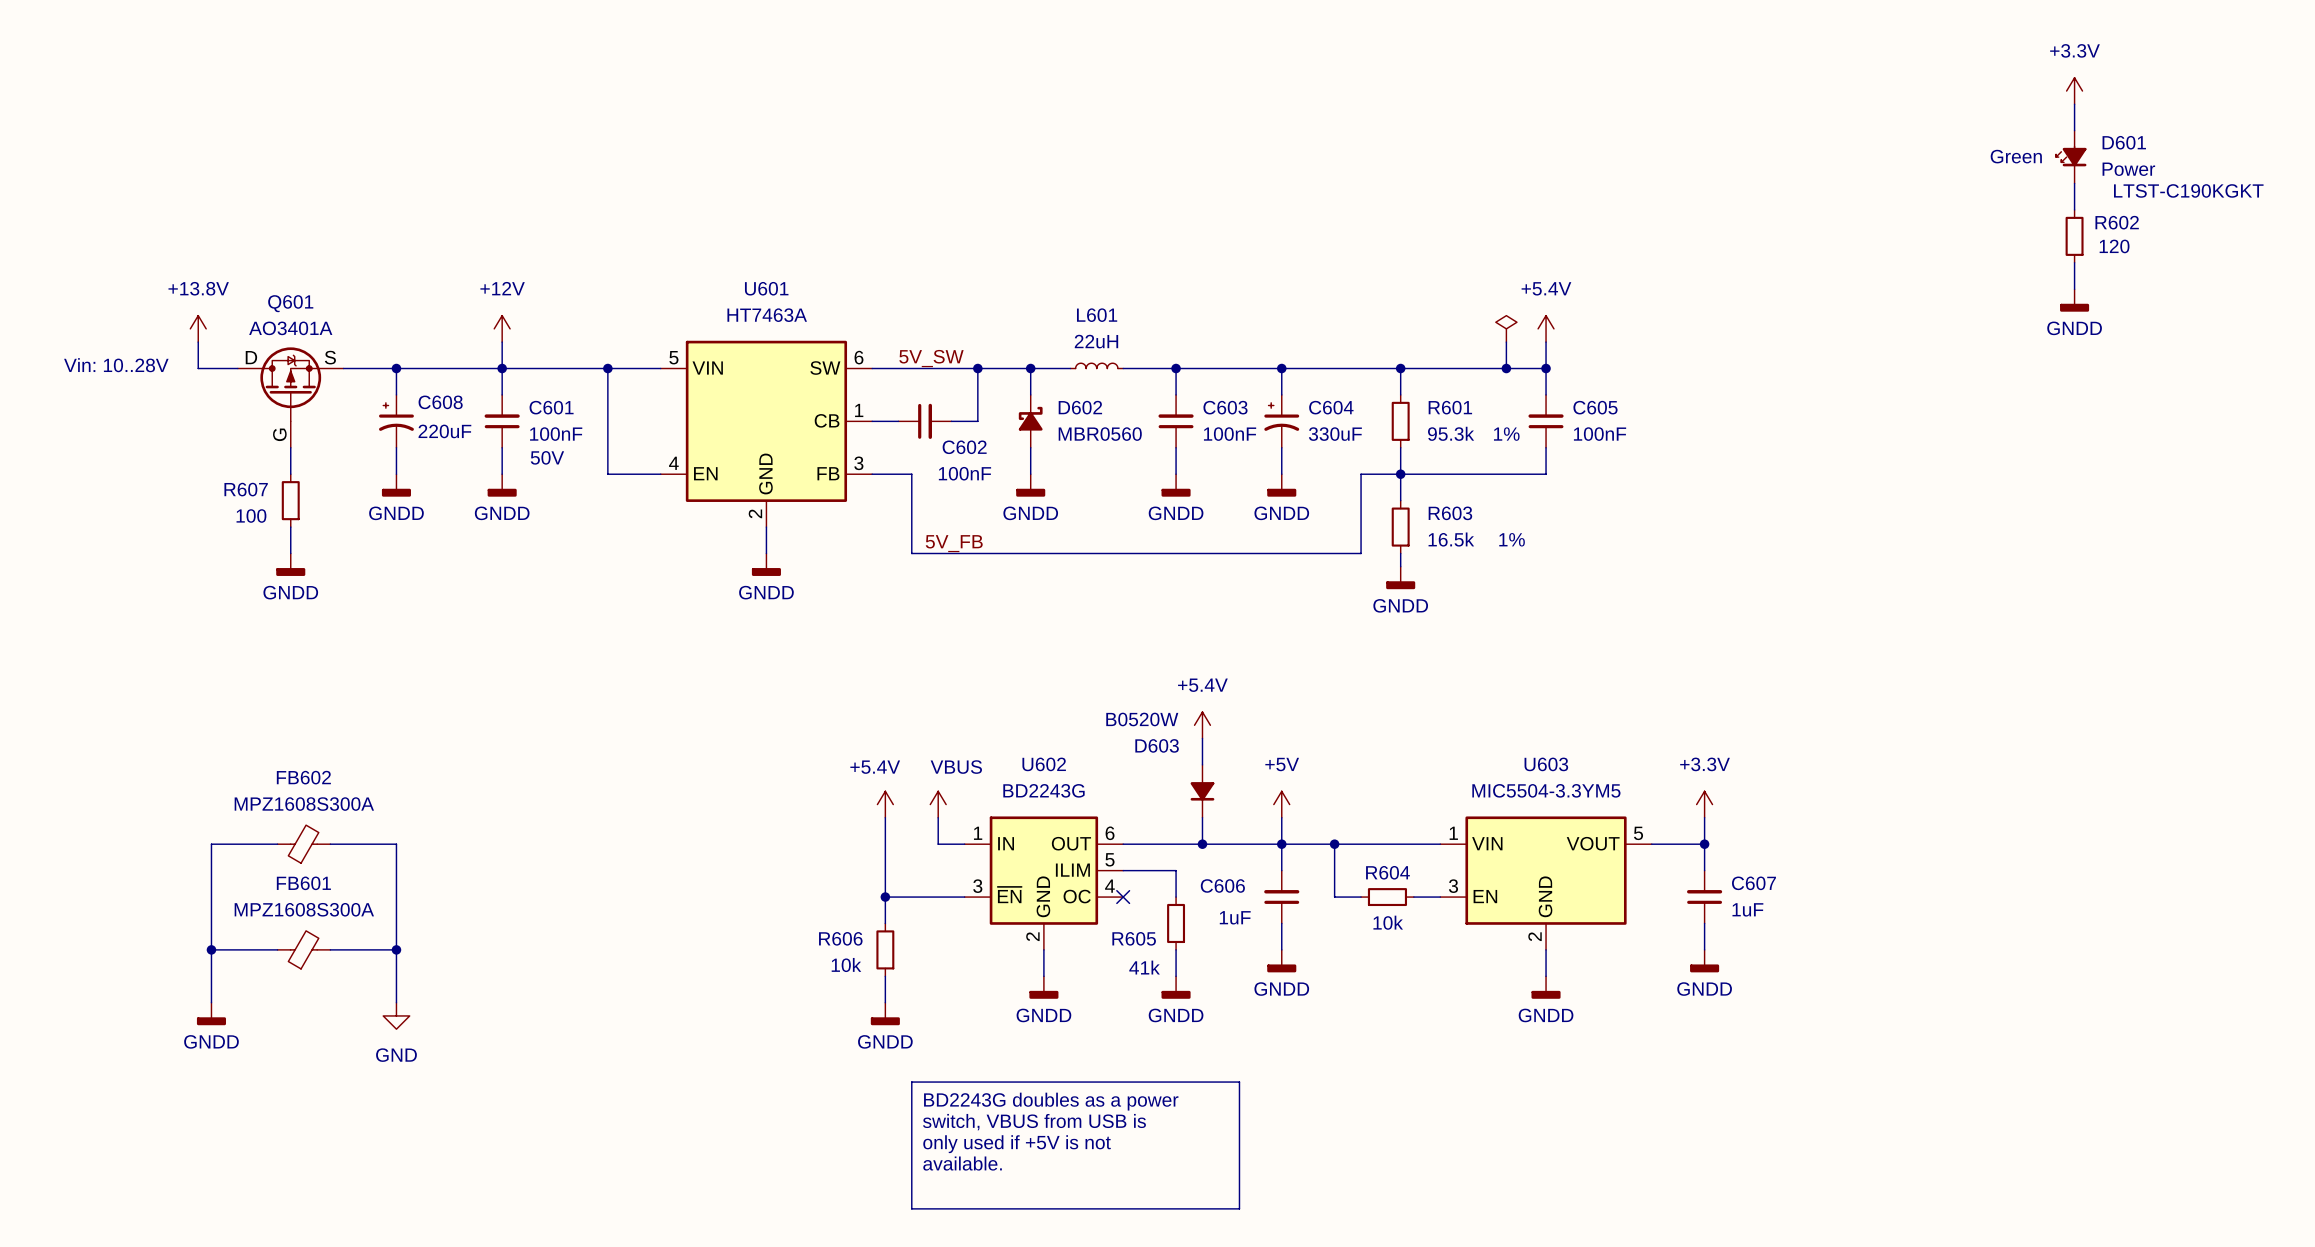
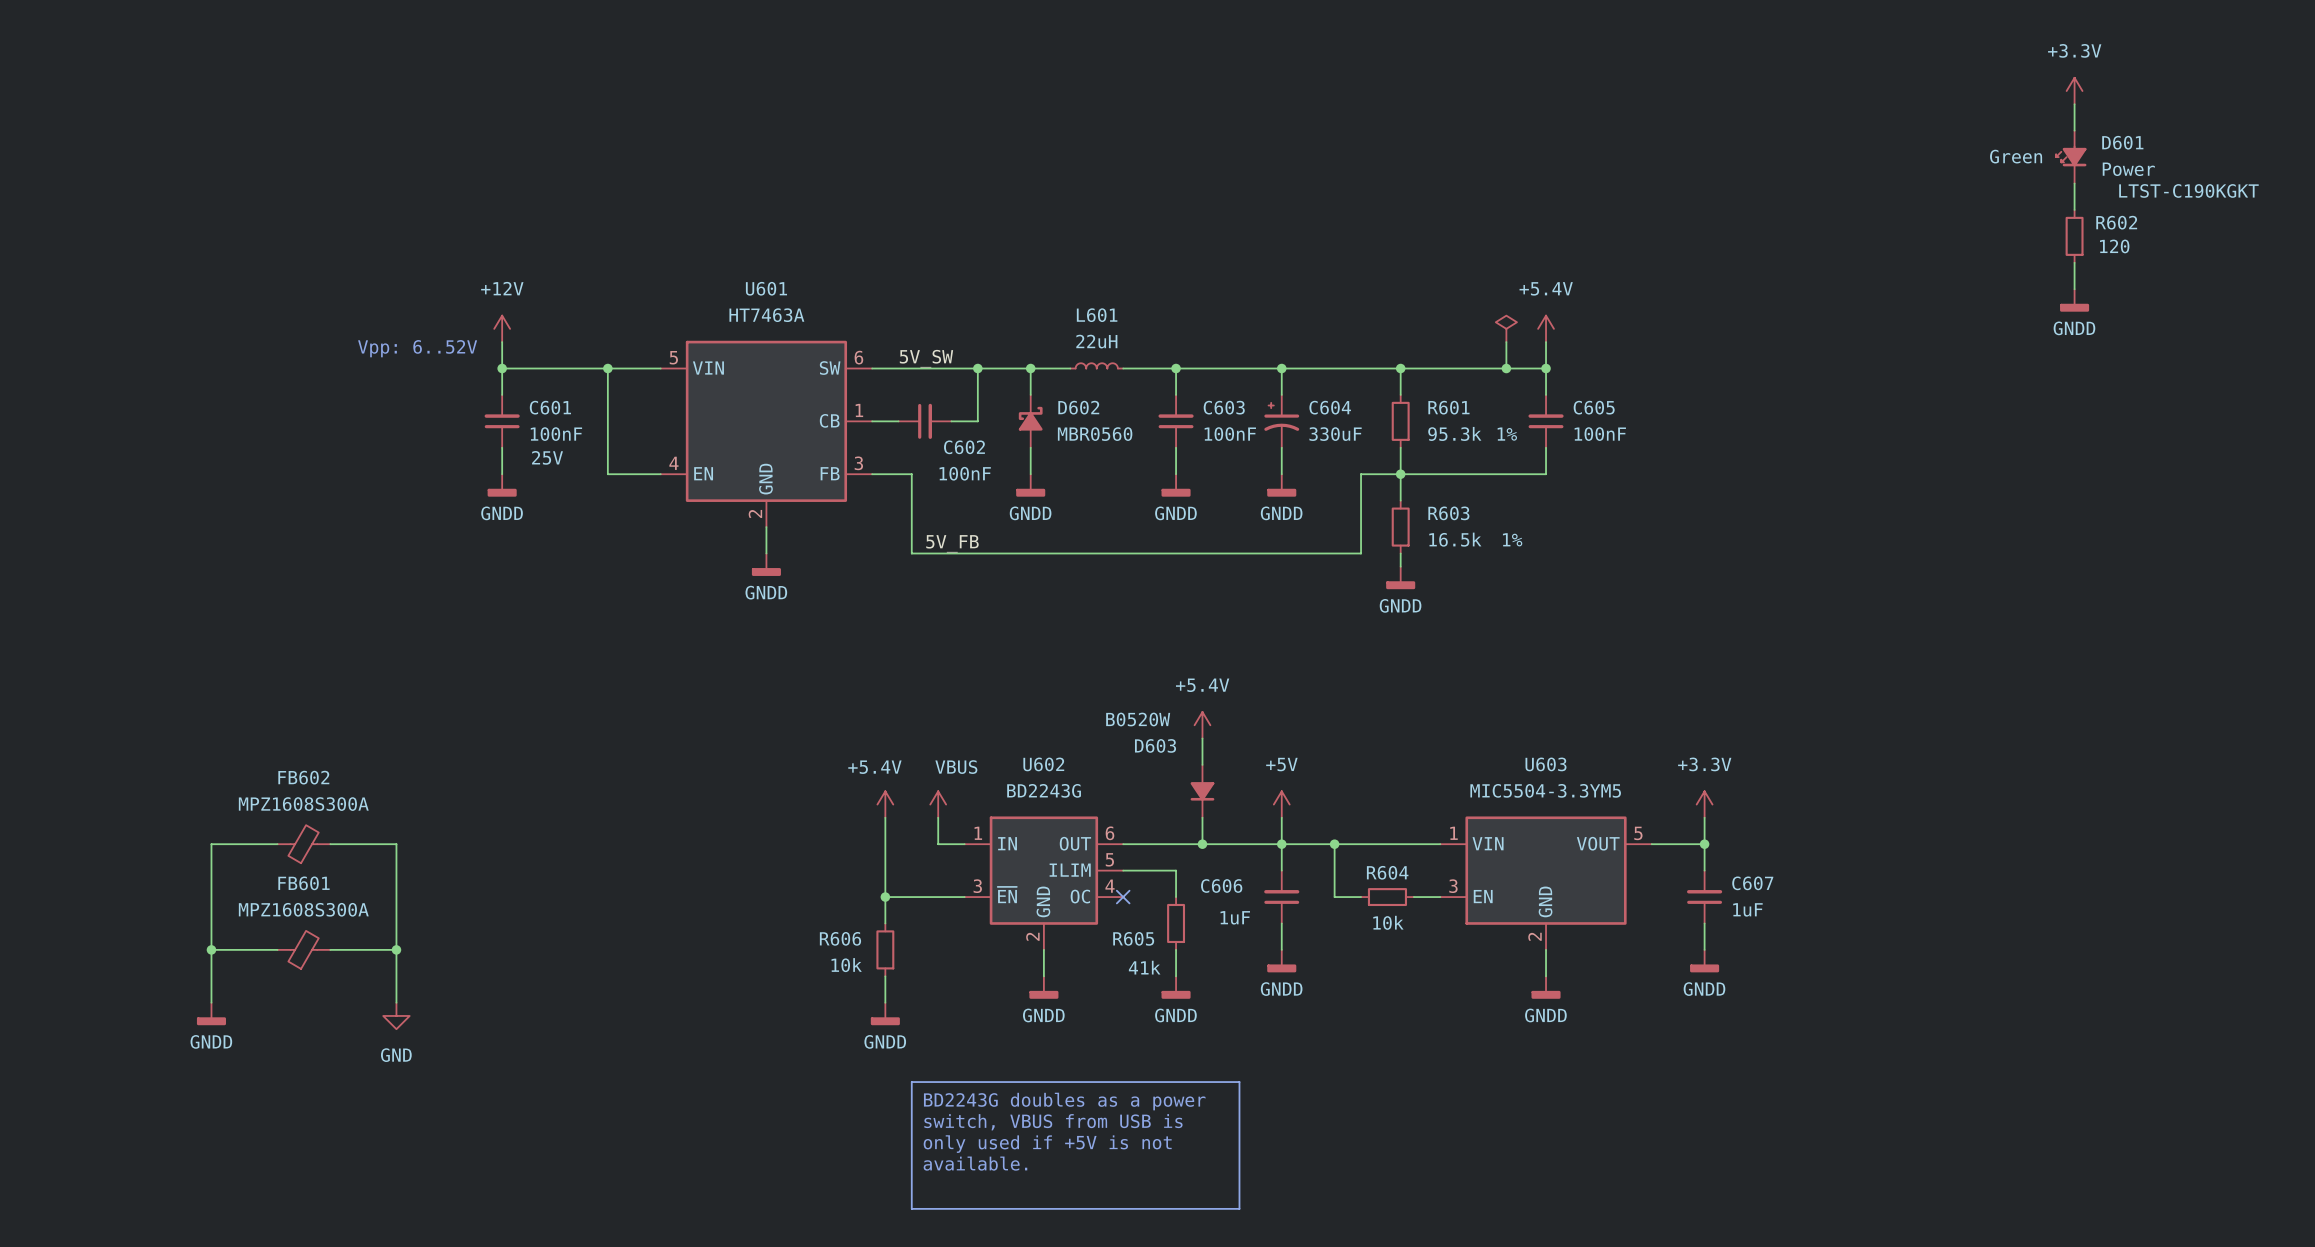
power symbol: +13.8V (198, 328) -> none
wire: (198, 342) (198, 368) (237, 368) -> none
text: none -> Vpp: 6..52V (417, 348)
text: Vin: 10..28V (116, 365) -> none
wire: (343, 368) (502, 368) -> none
wire: (396, 368) (396, 394) -> none
junction: (396, 368) -> none
Q601: AO3401A (290, 397) -> none
C608: 220uF (396, 421) -> none
wire: (290, 447) (290, 474) -> none
wire: (396, 447) (396, 474) -> none
C601 text: 50V (547, 457) -> 25V (547, 457)
power symbol: GNDD (396, 485) -> none
R607: 100 (290, 500) -> none
wire: (290, 527) (290, 553) -> none
power symbol: GNDD (290, 564) -> none

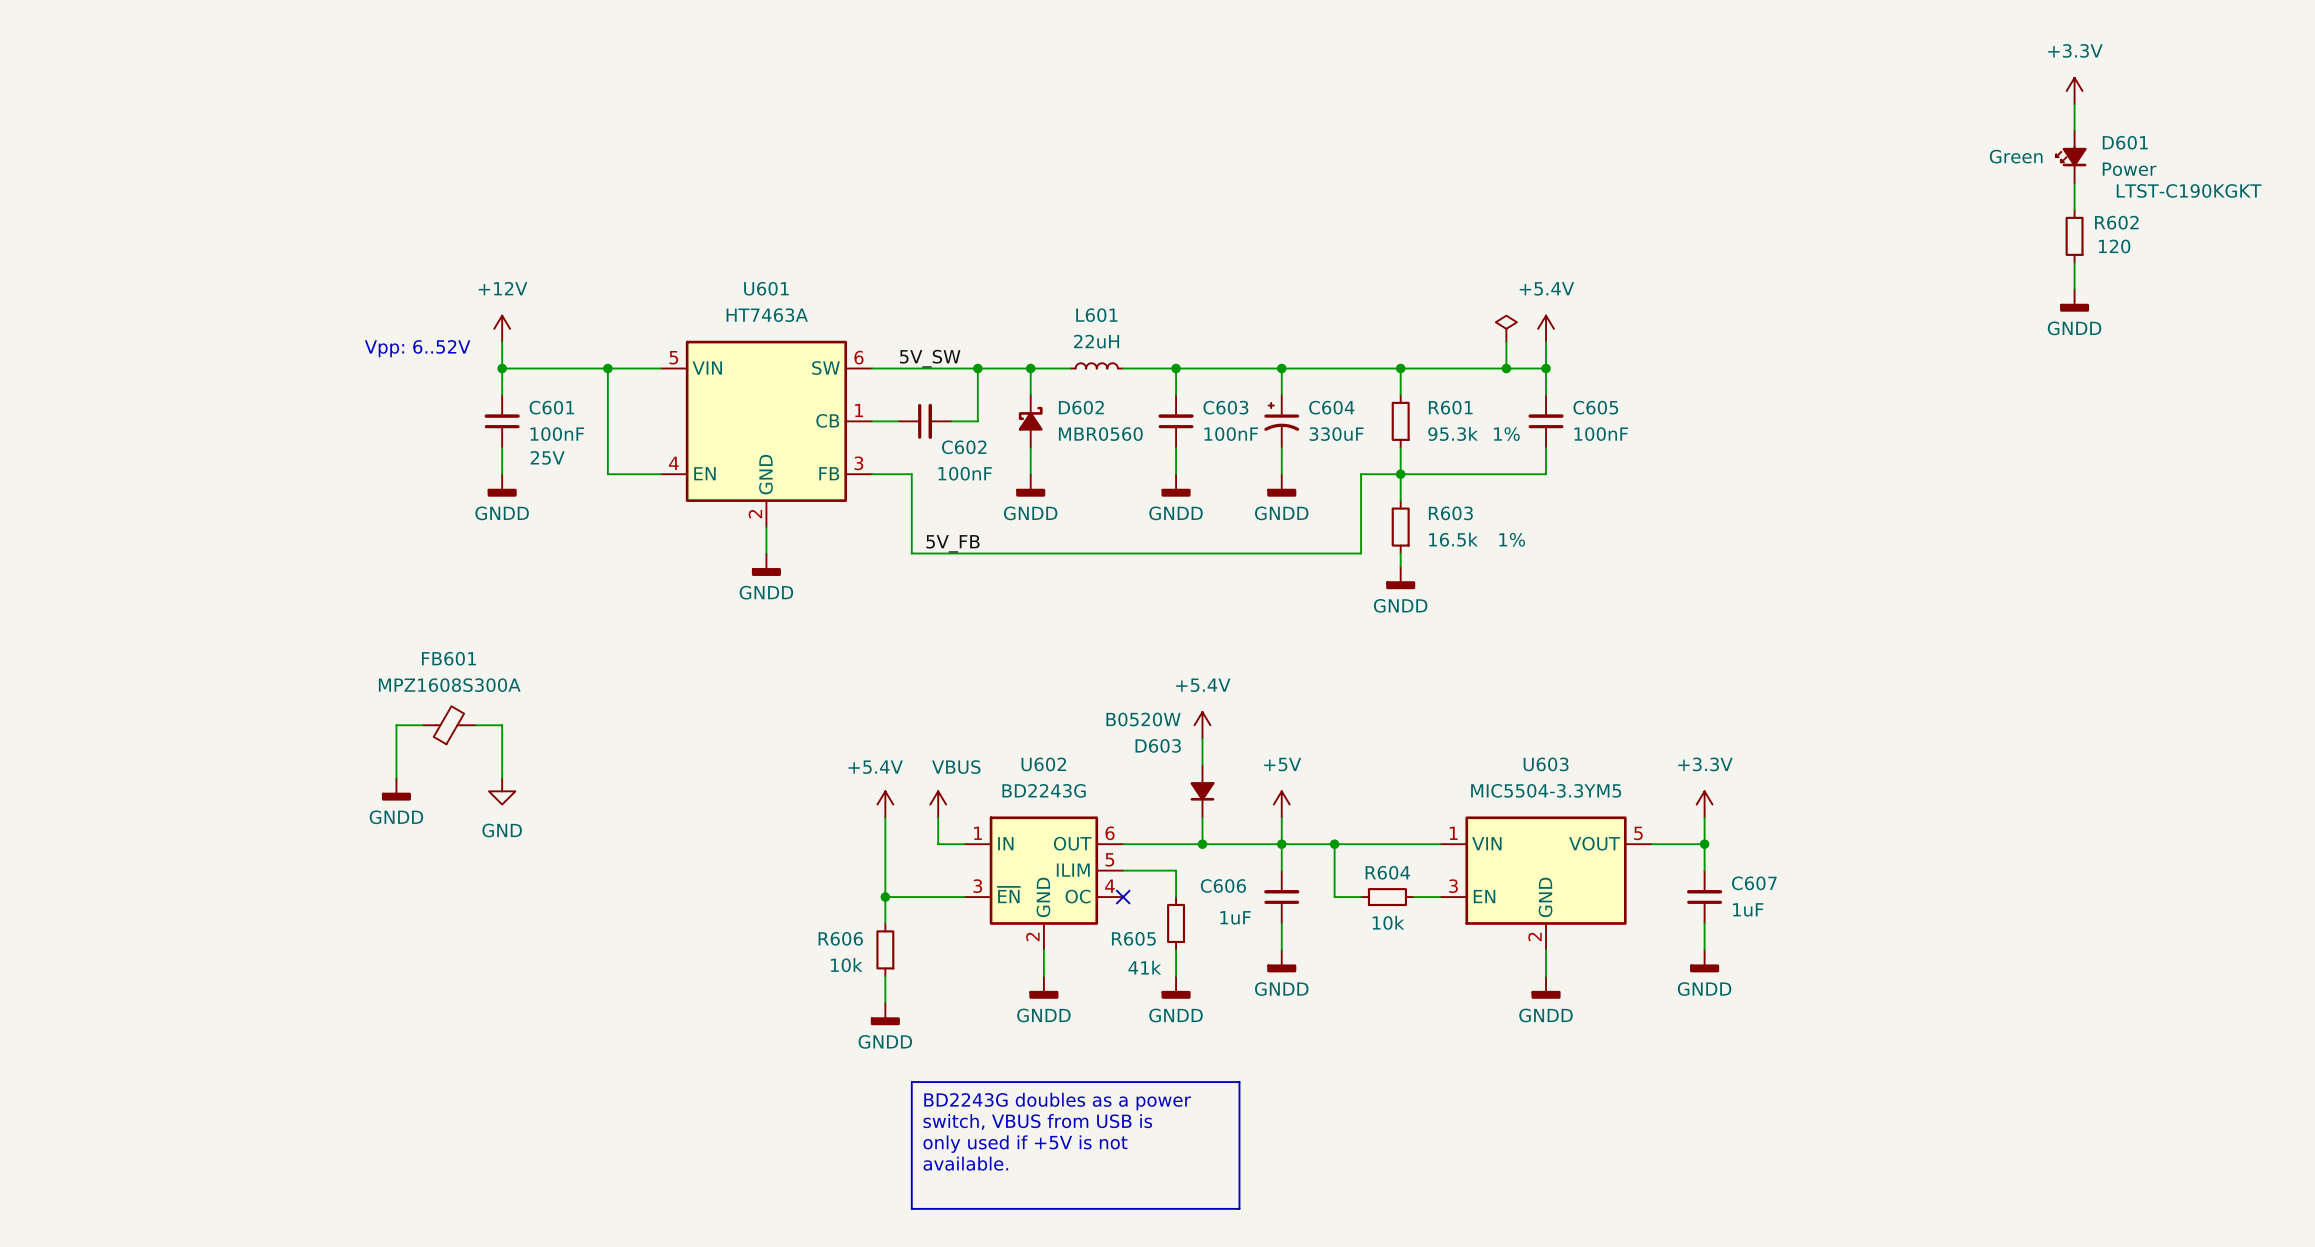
wire: none -> (422, 725) (396, 725) (396, 778)
wire: none -> (475, 725) (502, 725) (502, 778)
power symbol: none -> GNDD (396, 789)
wire: (277, 844) (211, 844) (211, 1002) -> none
FB602: MPZ1608S300A (303, 844) -> none
wire: (330, 844) (396, 844) (396, 1002) -> none
wire: (211, 949) (277, 949) -> none
junction: (211, 949) -> none
FB601 position: (303, 949) -> (449, 725)
wire: (330, 949) (396, 949) -> none
junction: (396, 949) -> none
power symbol: GNDD (211, 1013) -> none
power symbol position: GND (396, 1015) -> GND (502, 791)

